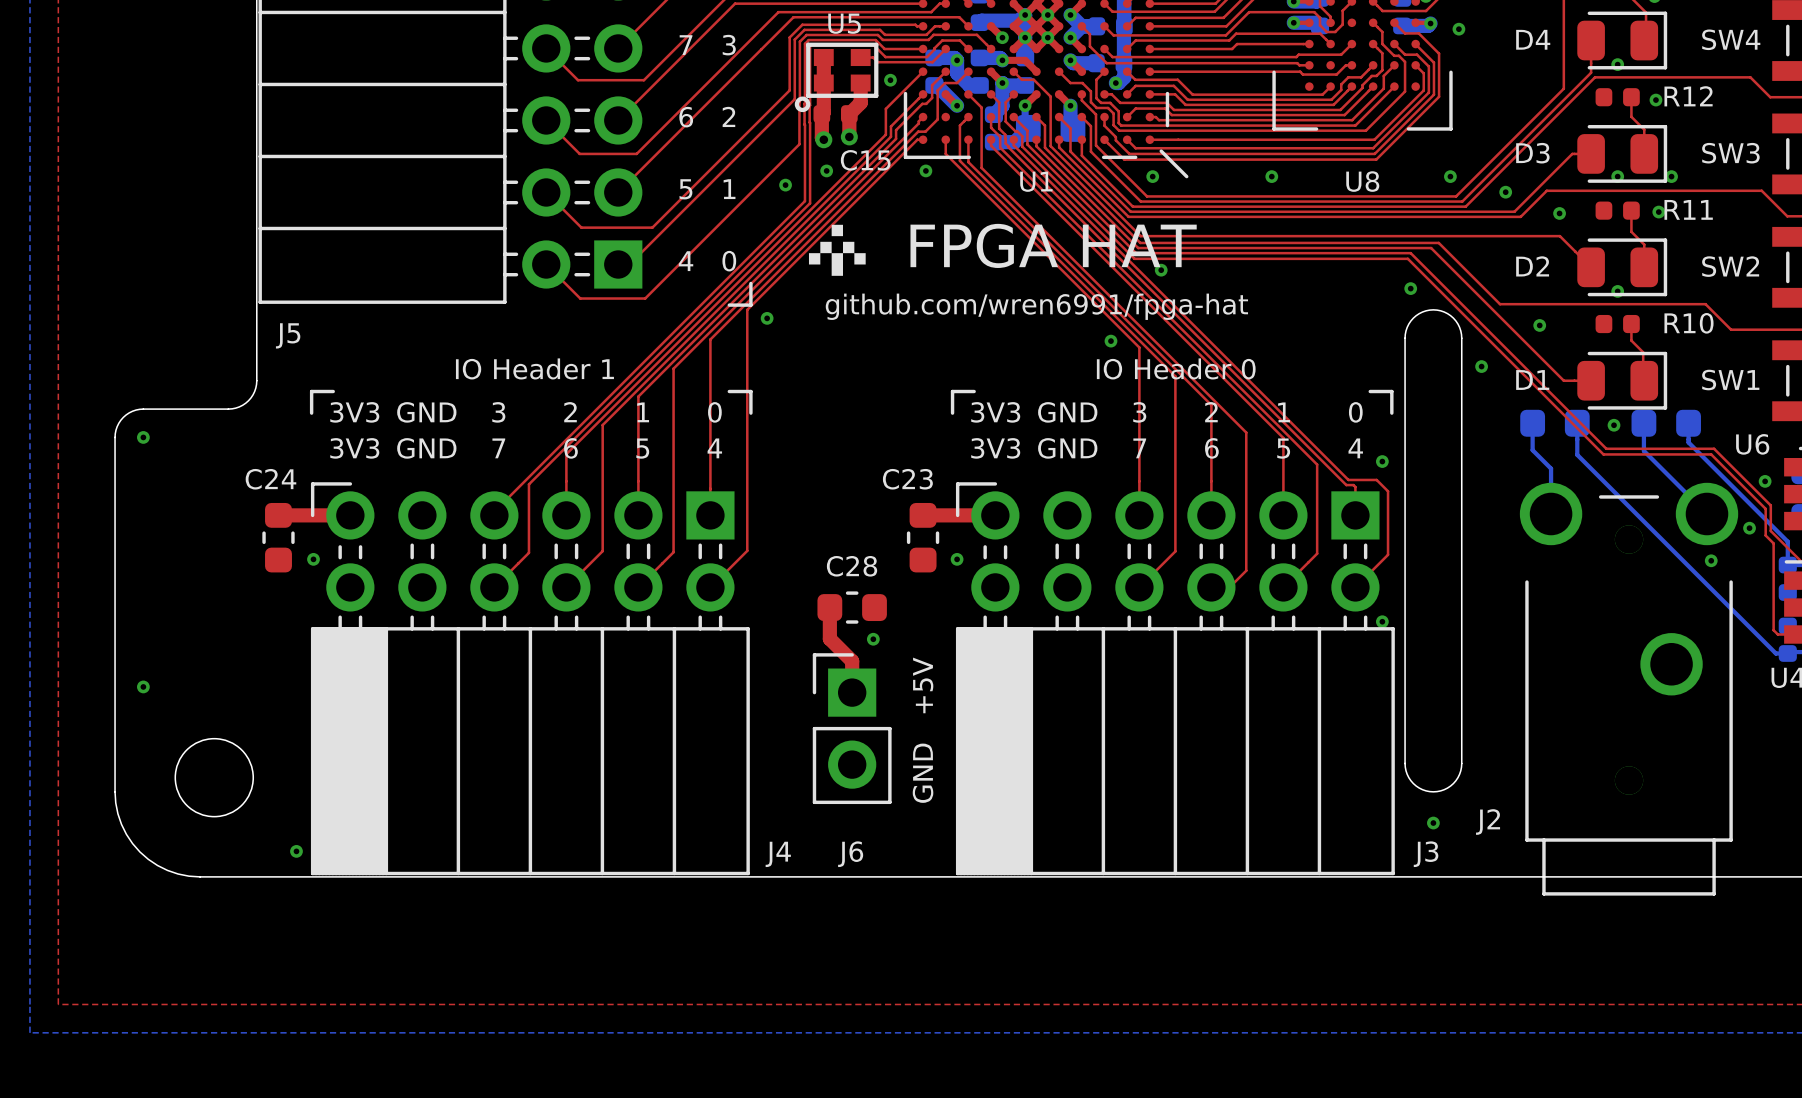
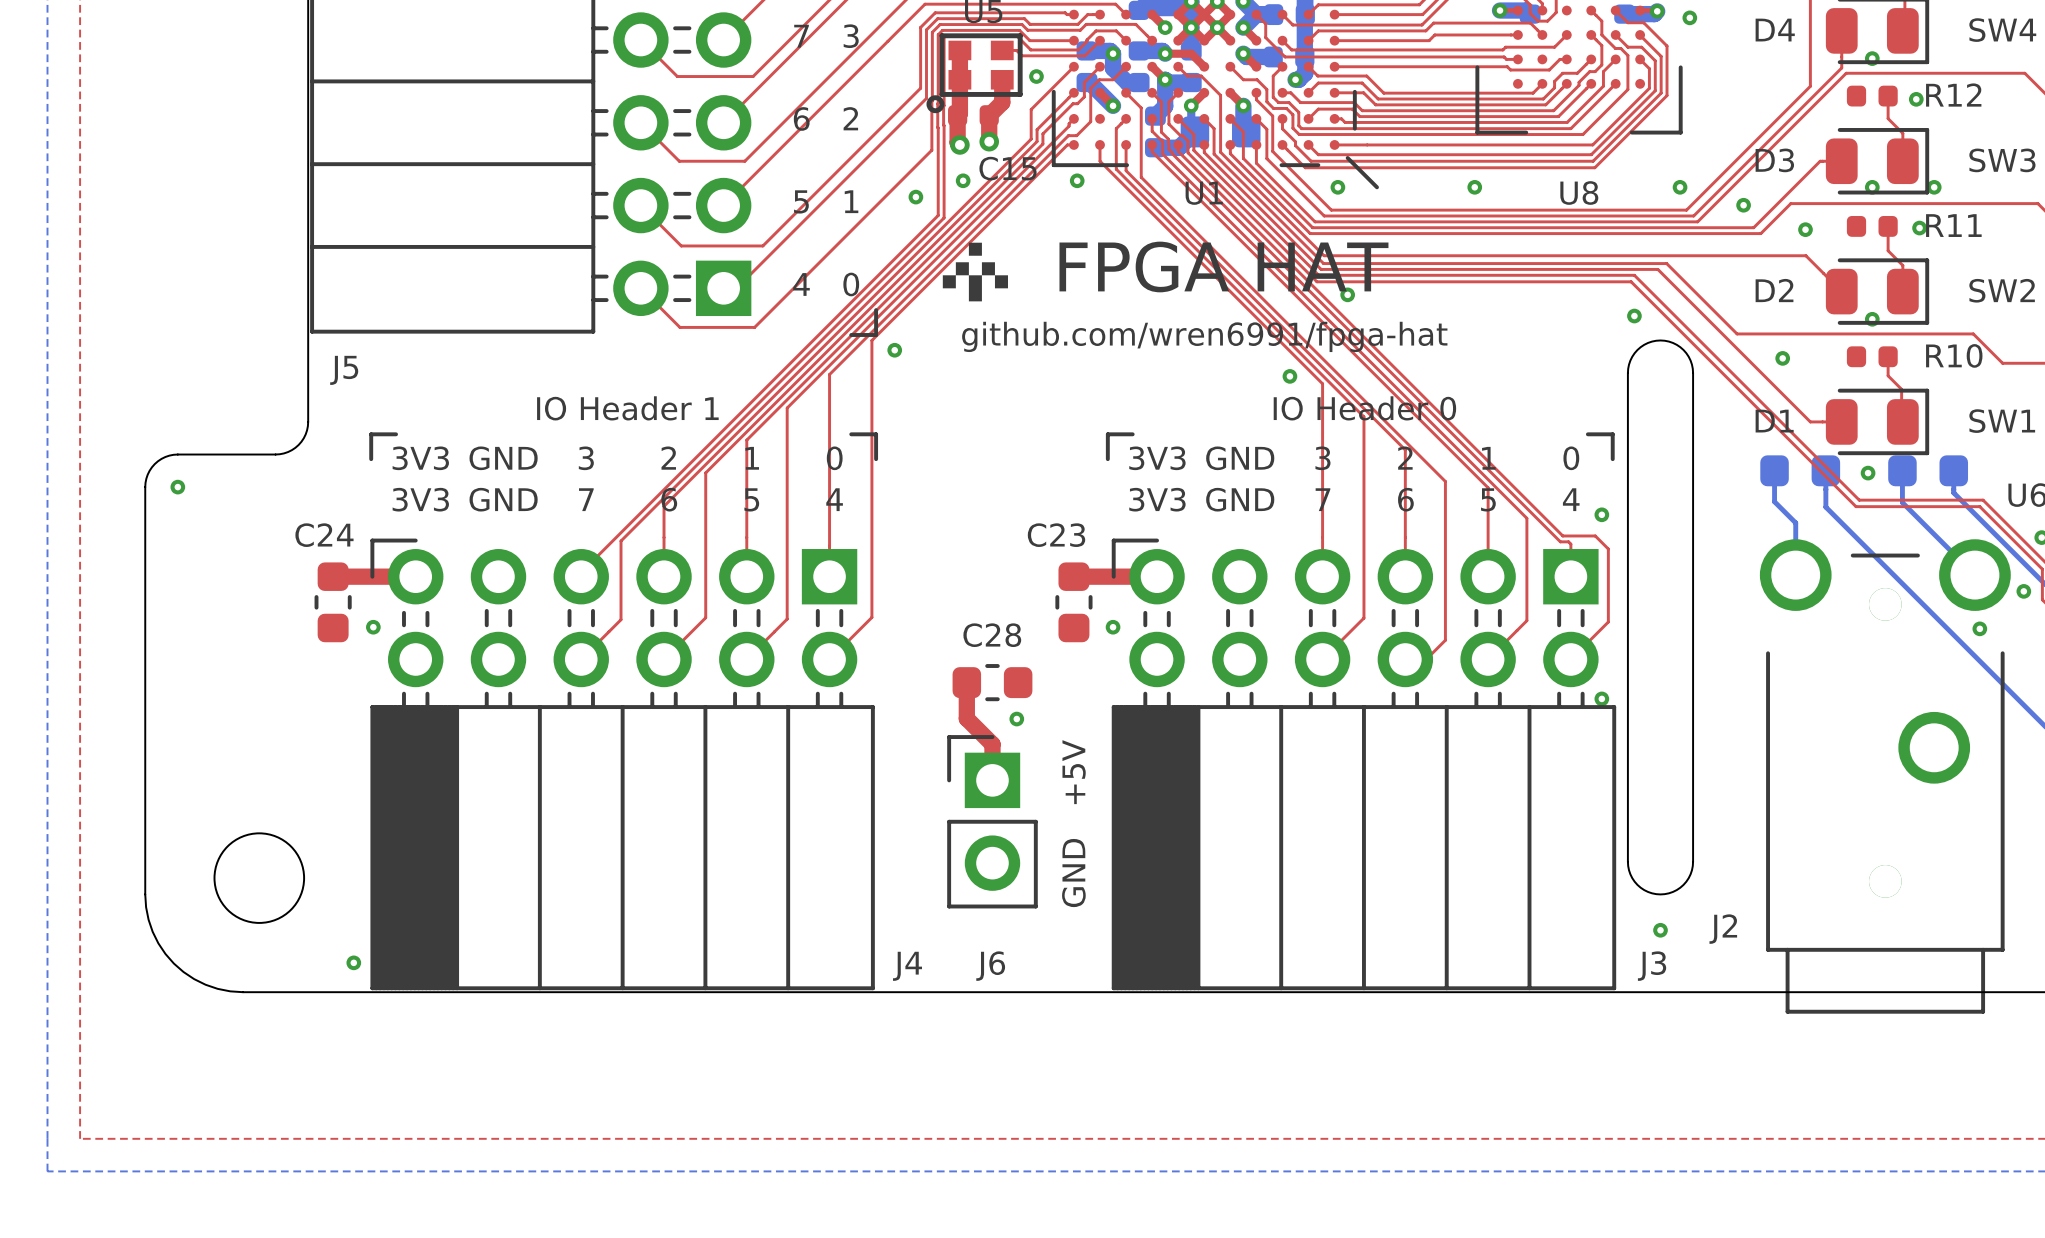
via: (1481, 366) -> none
via: (143, 686) -> none

